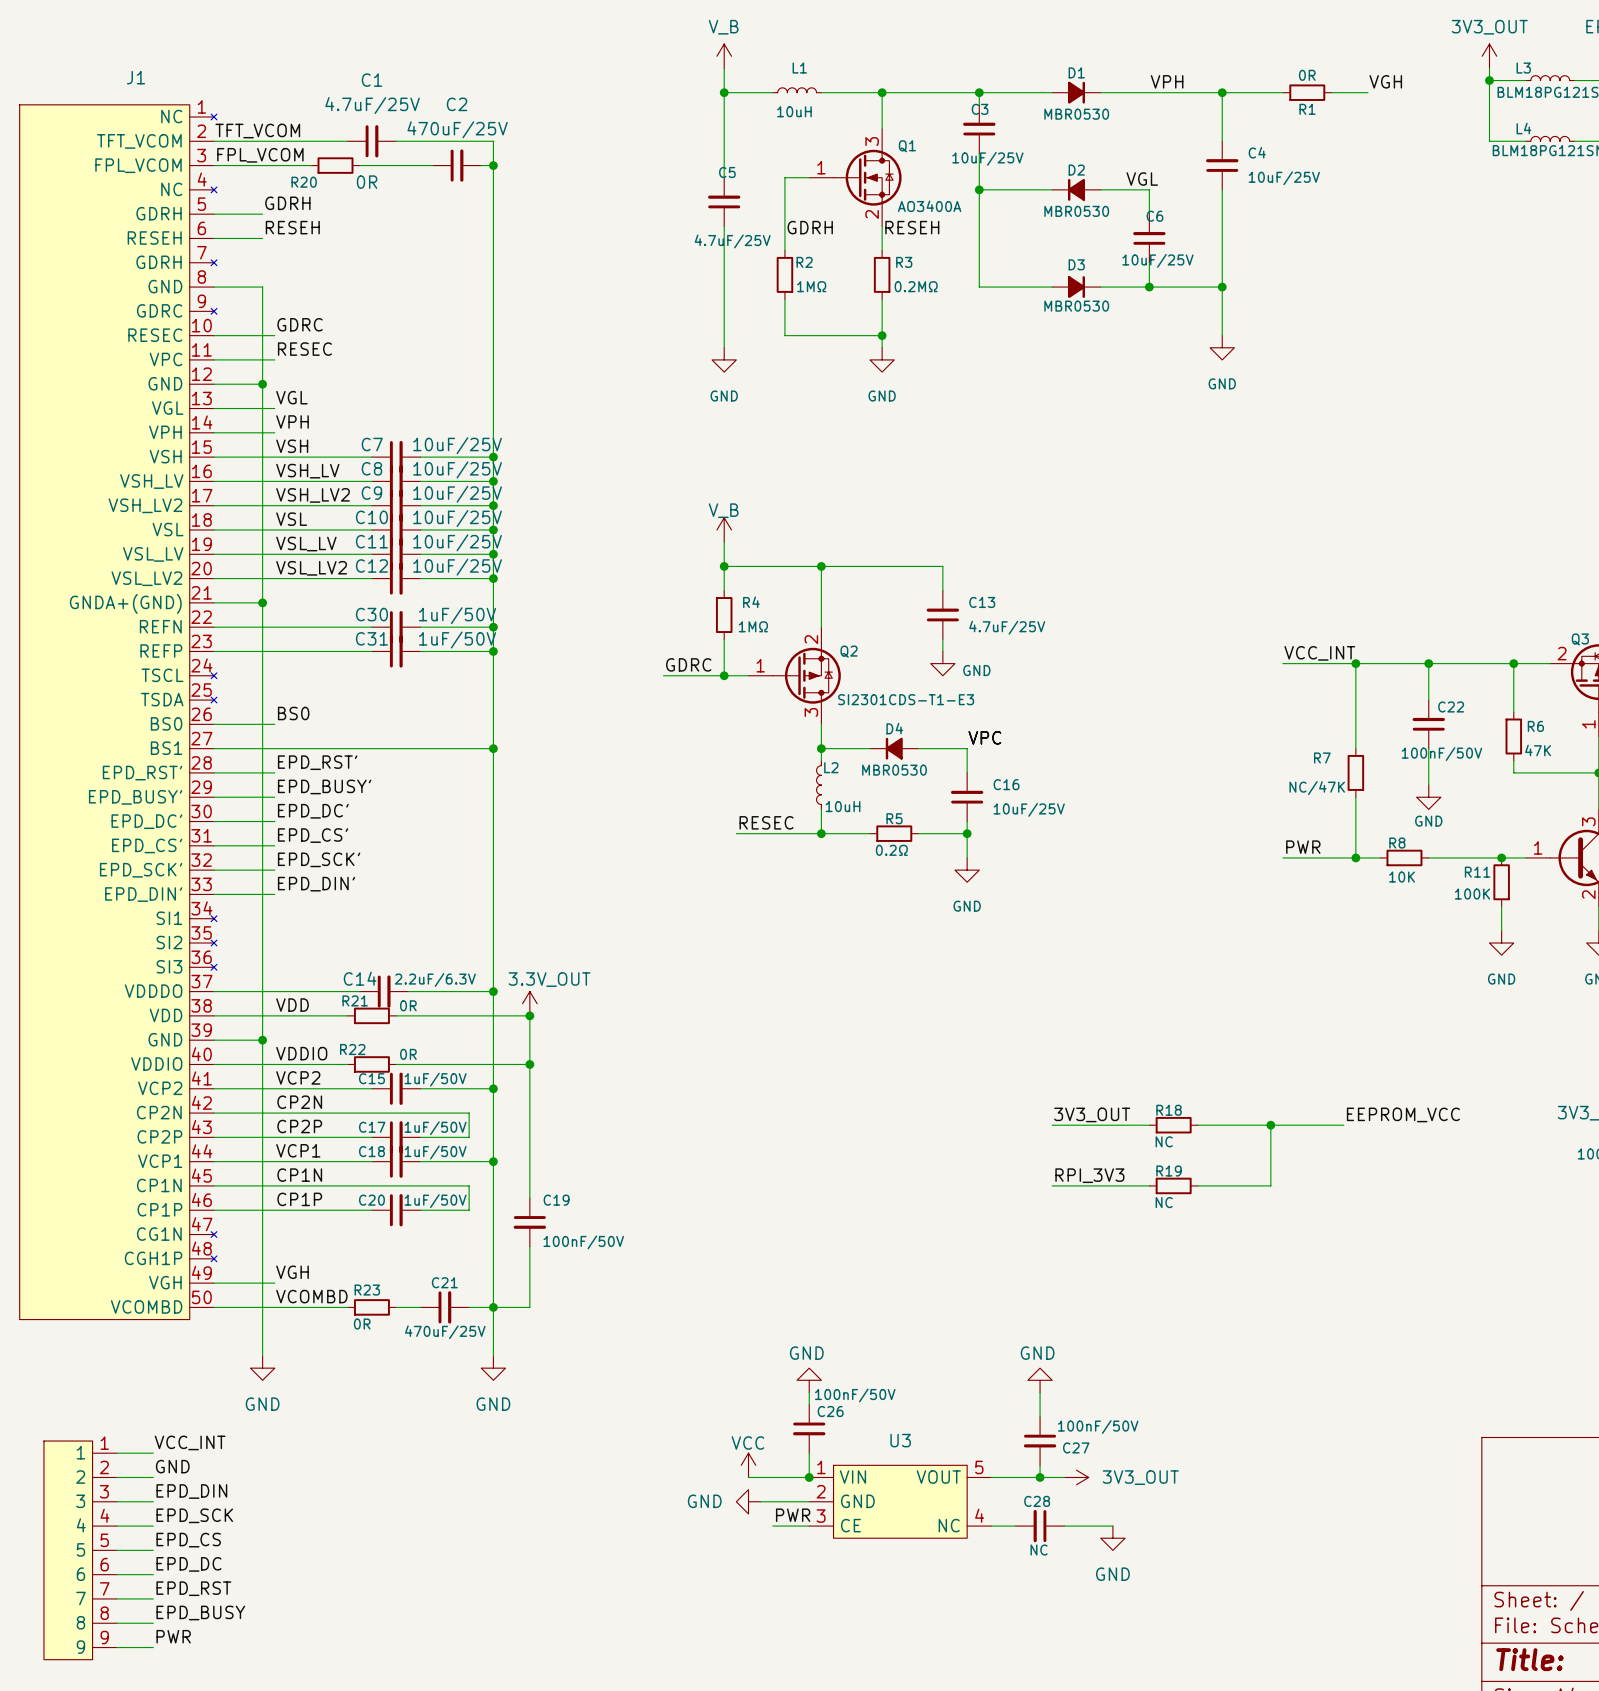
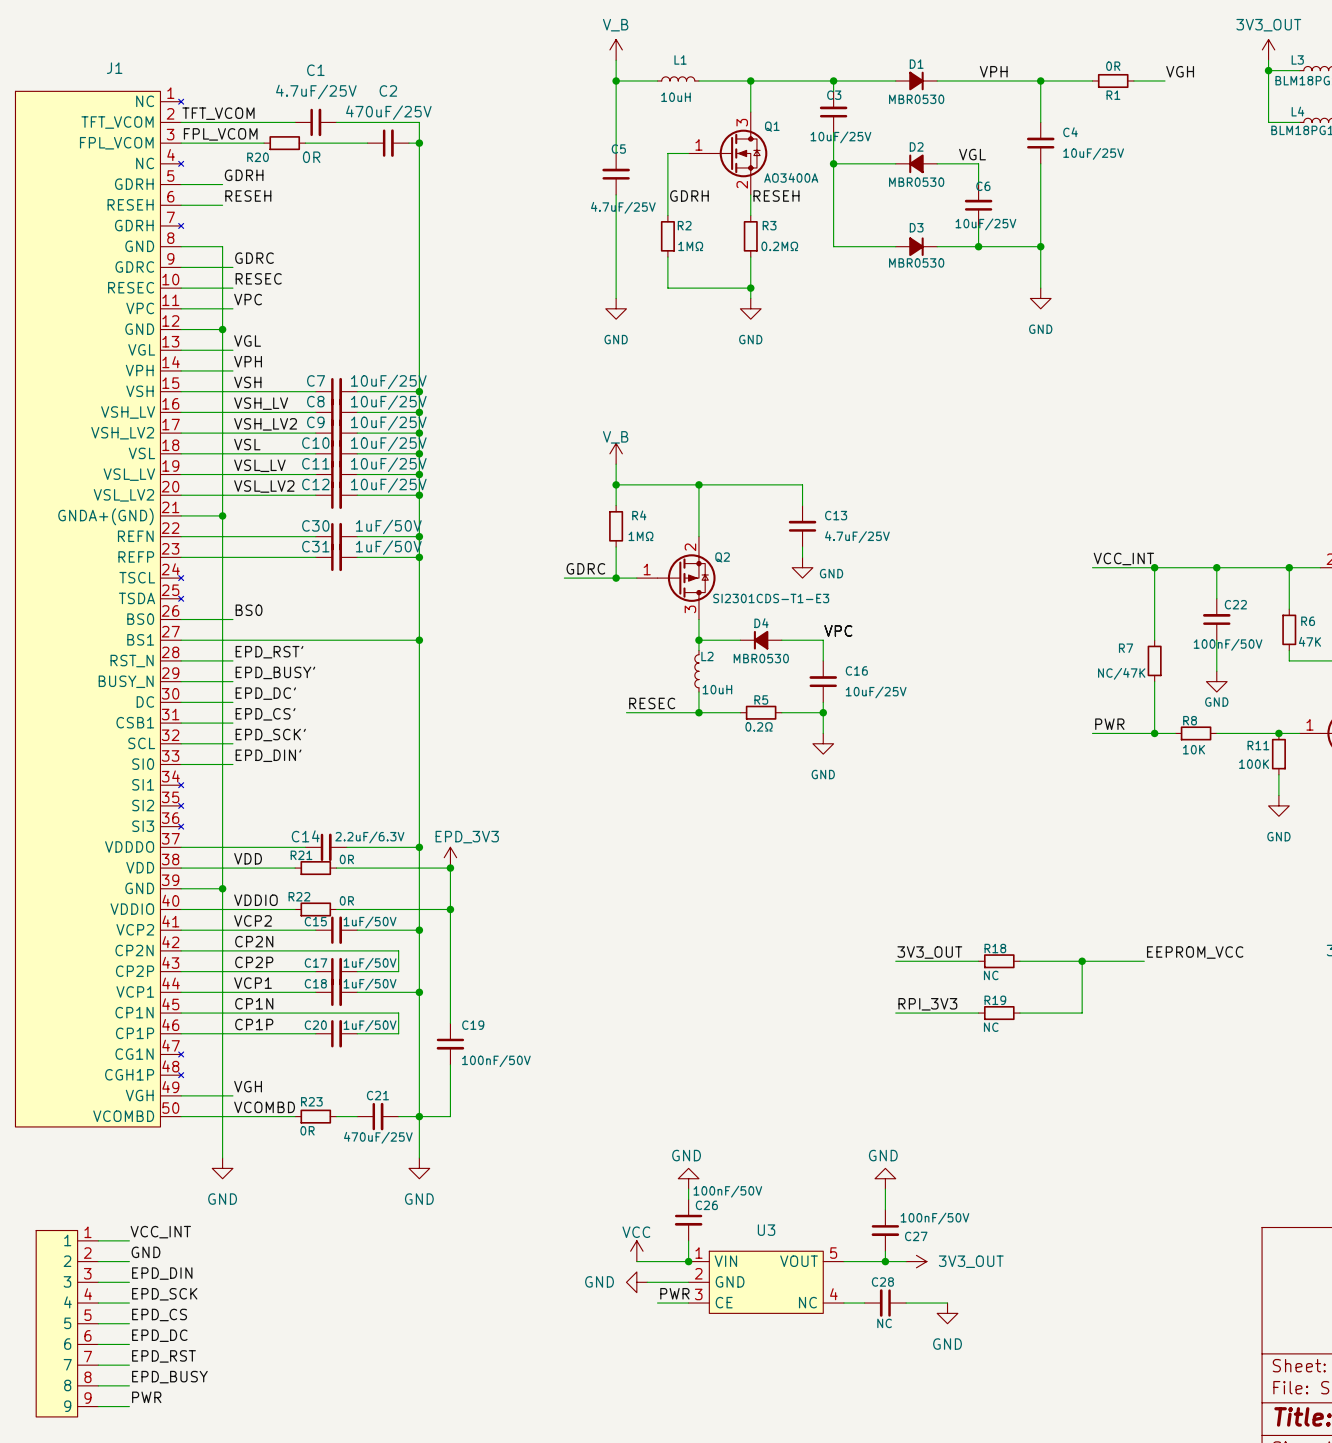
J1 symbol: [19, 104, 217, 1320] -> [15, 91, 184, 1127]
label: none -> GDRC (254, 258)
wire: none -> (181, 267) (232, 267)
label: GDRC (300, 324) -> RESEC (258, 278)
label: RESEC (304, 349) -> VPC (248, 299)
power symbol: 3.3V_OUT (529, 1003) -> EPD_3V3 (450, 857)

